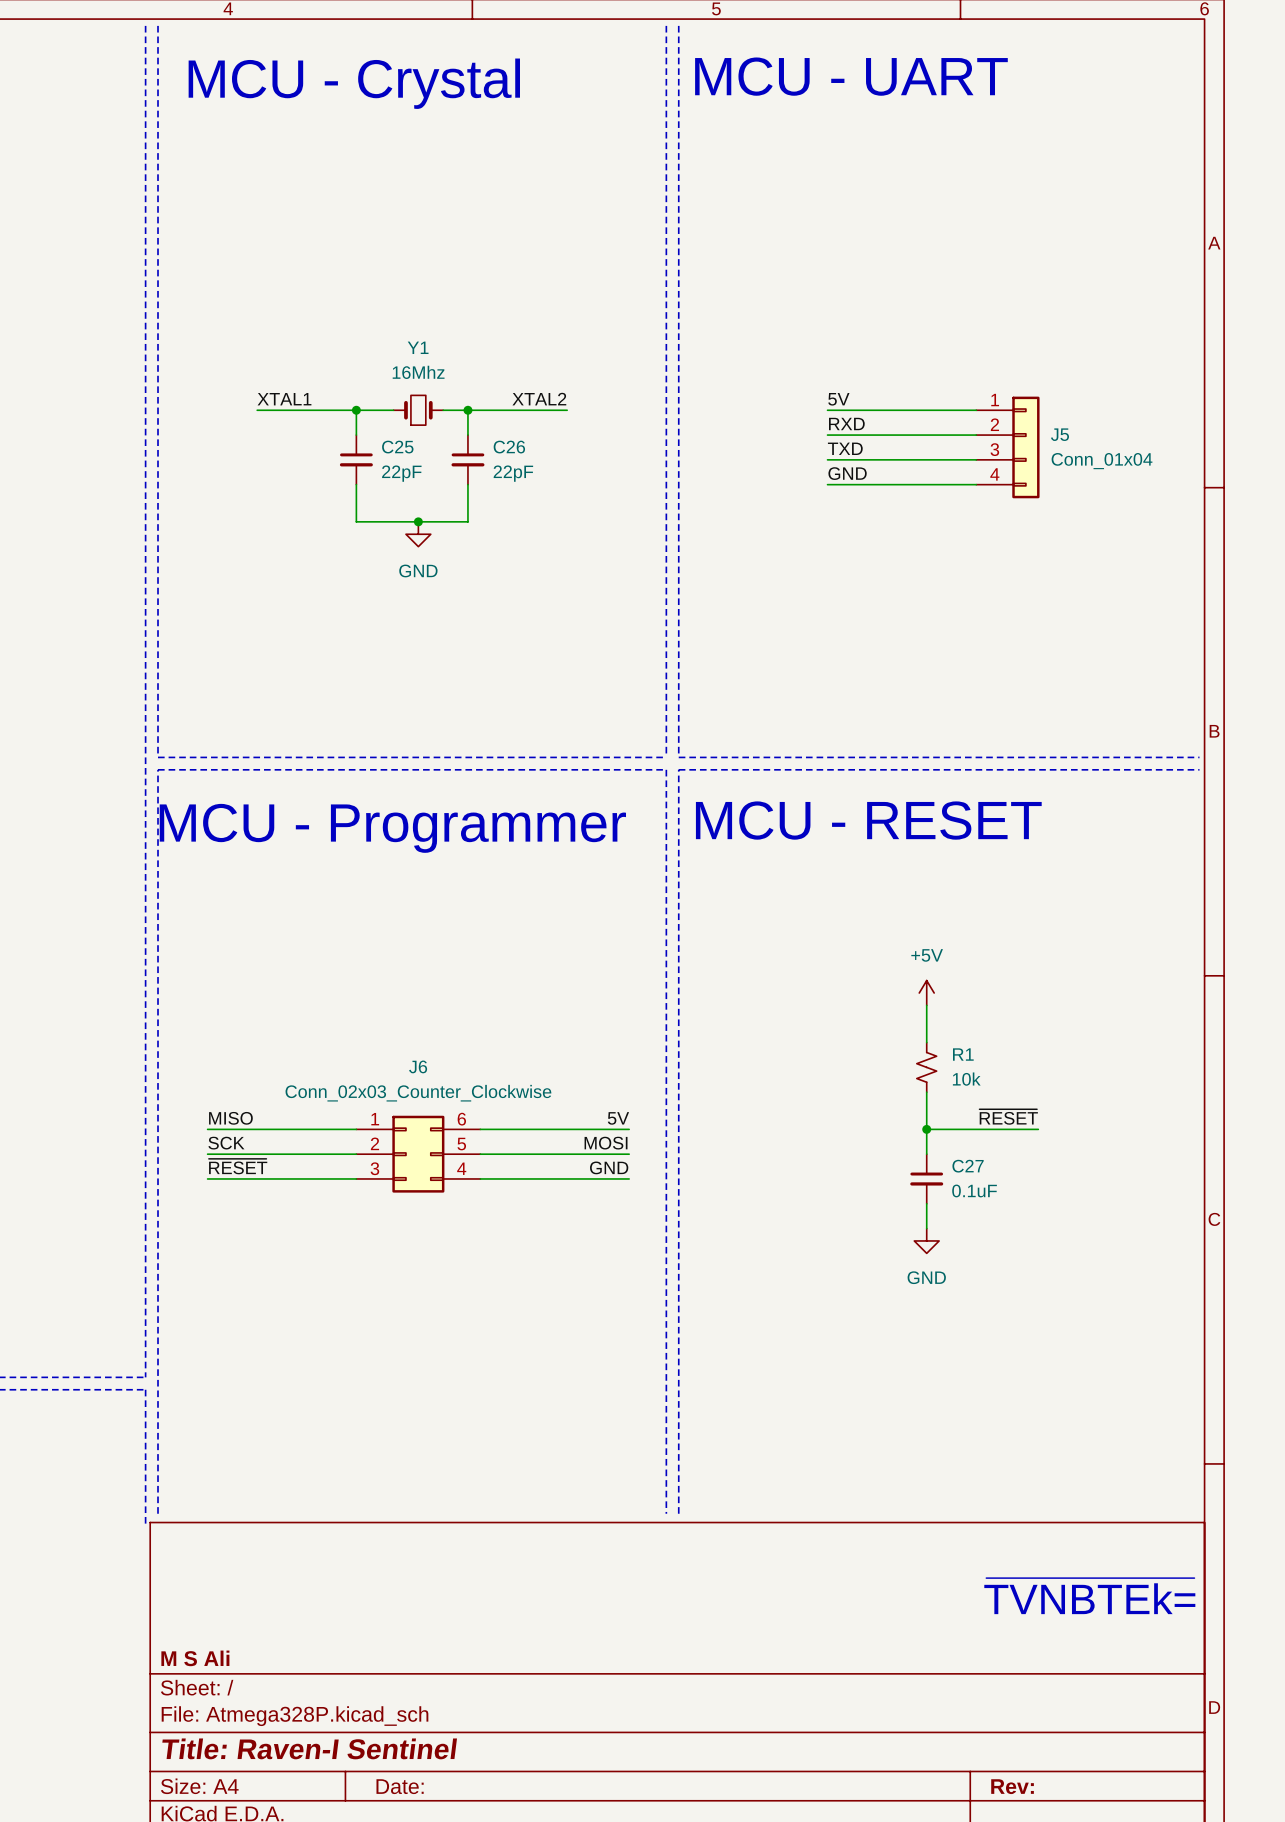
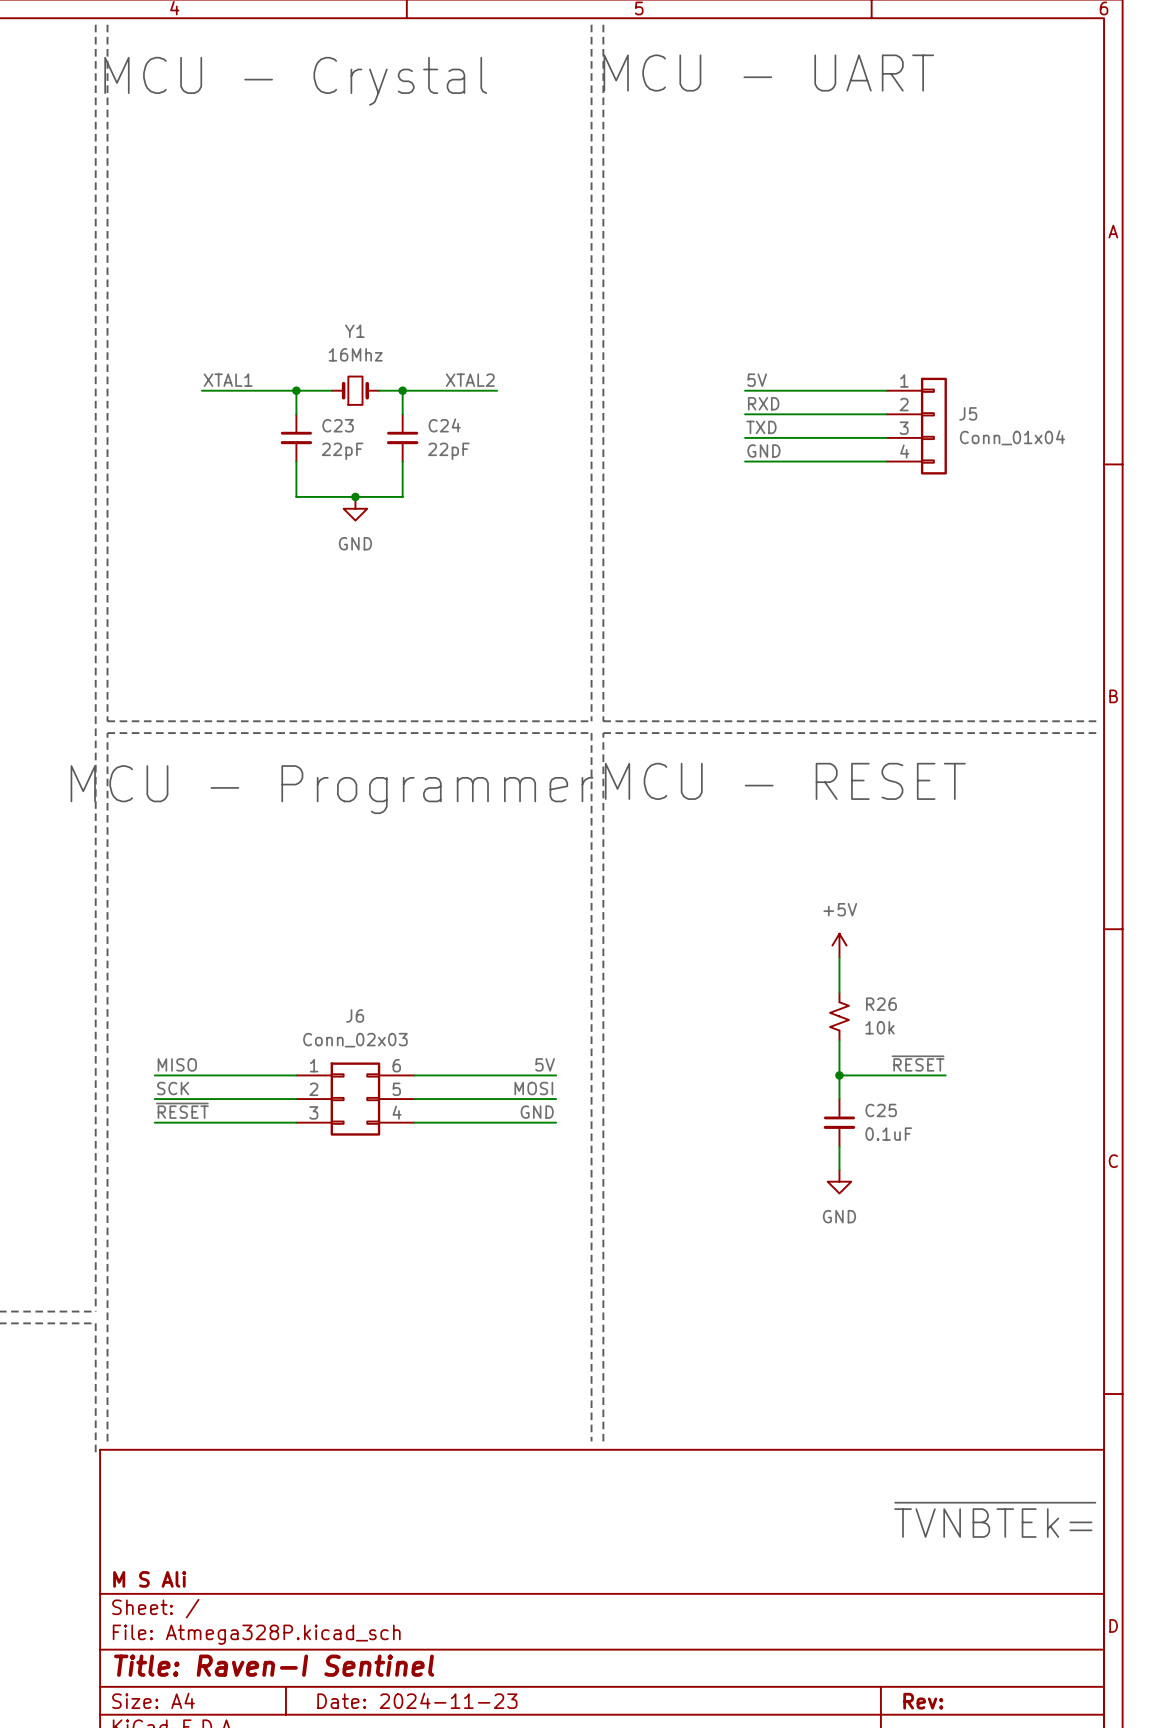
C25 name: C25 (397, 447) -> C23 (338, 425)
C26 name: C26 (509, 447) -> C24 (444, 425)
R1 name: R1 (963, 1054) -> R26 (881, 1004)
J6 value: Conn_02x03_Counter_Clockwise (418, 1093) -> Conn_02x03 (355, 1040)
C27 name: C27 (968, 1166) -> C25 (881, 1110)
title block: Date: (400, 1786) -> Date: 2024-11-23 (417, 1700)

